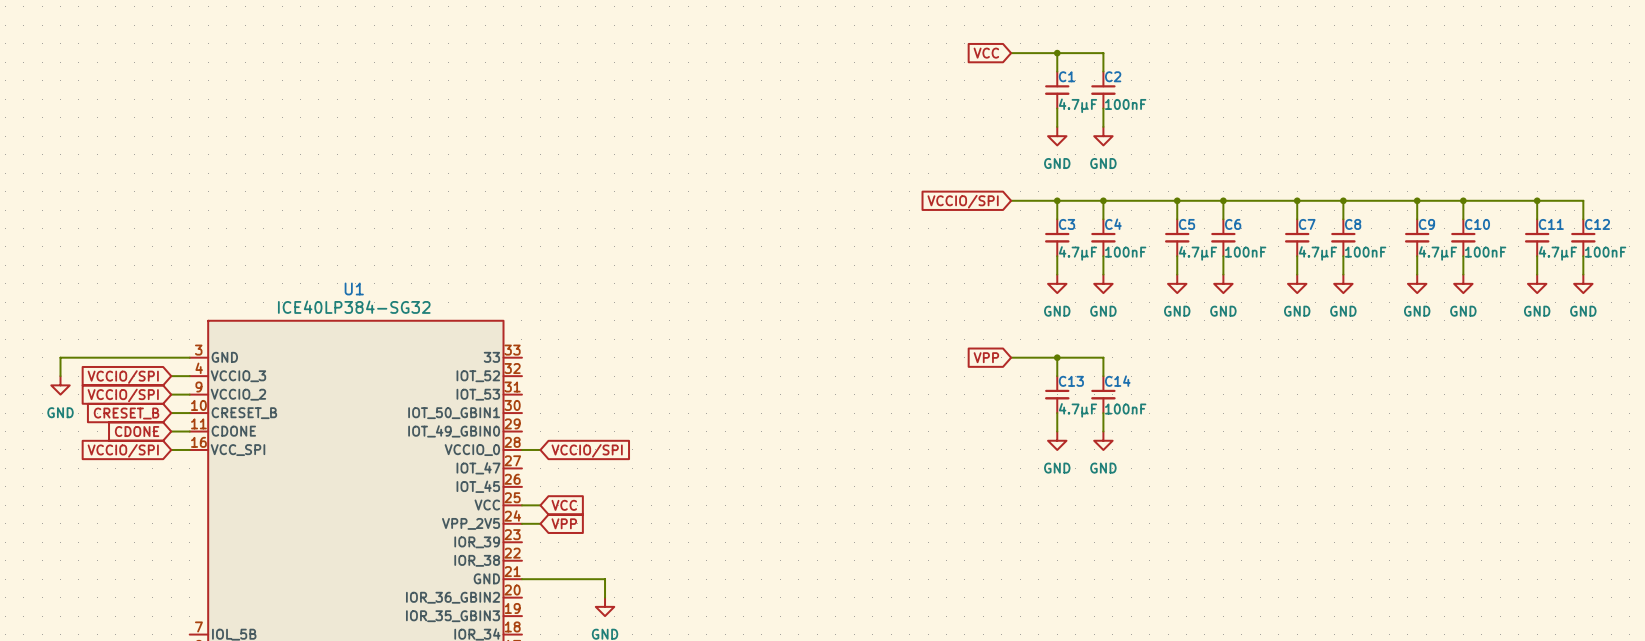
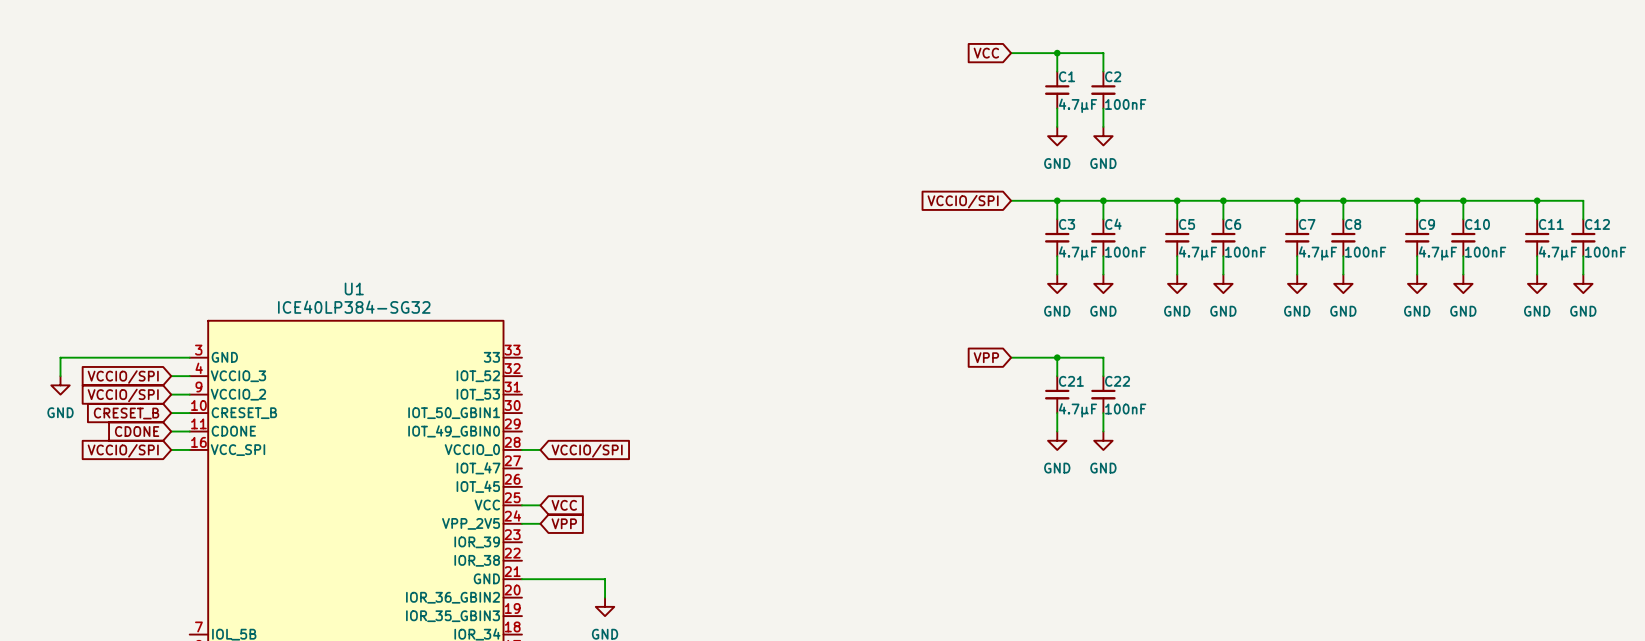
C13 name: C13 (1071, 381) -> C21 (1071, 381)
C14 name: C14 (1117, 381) -> C22 (1117, 381)

